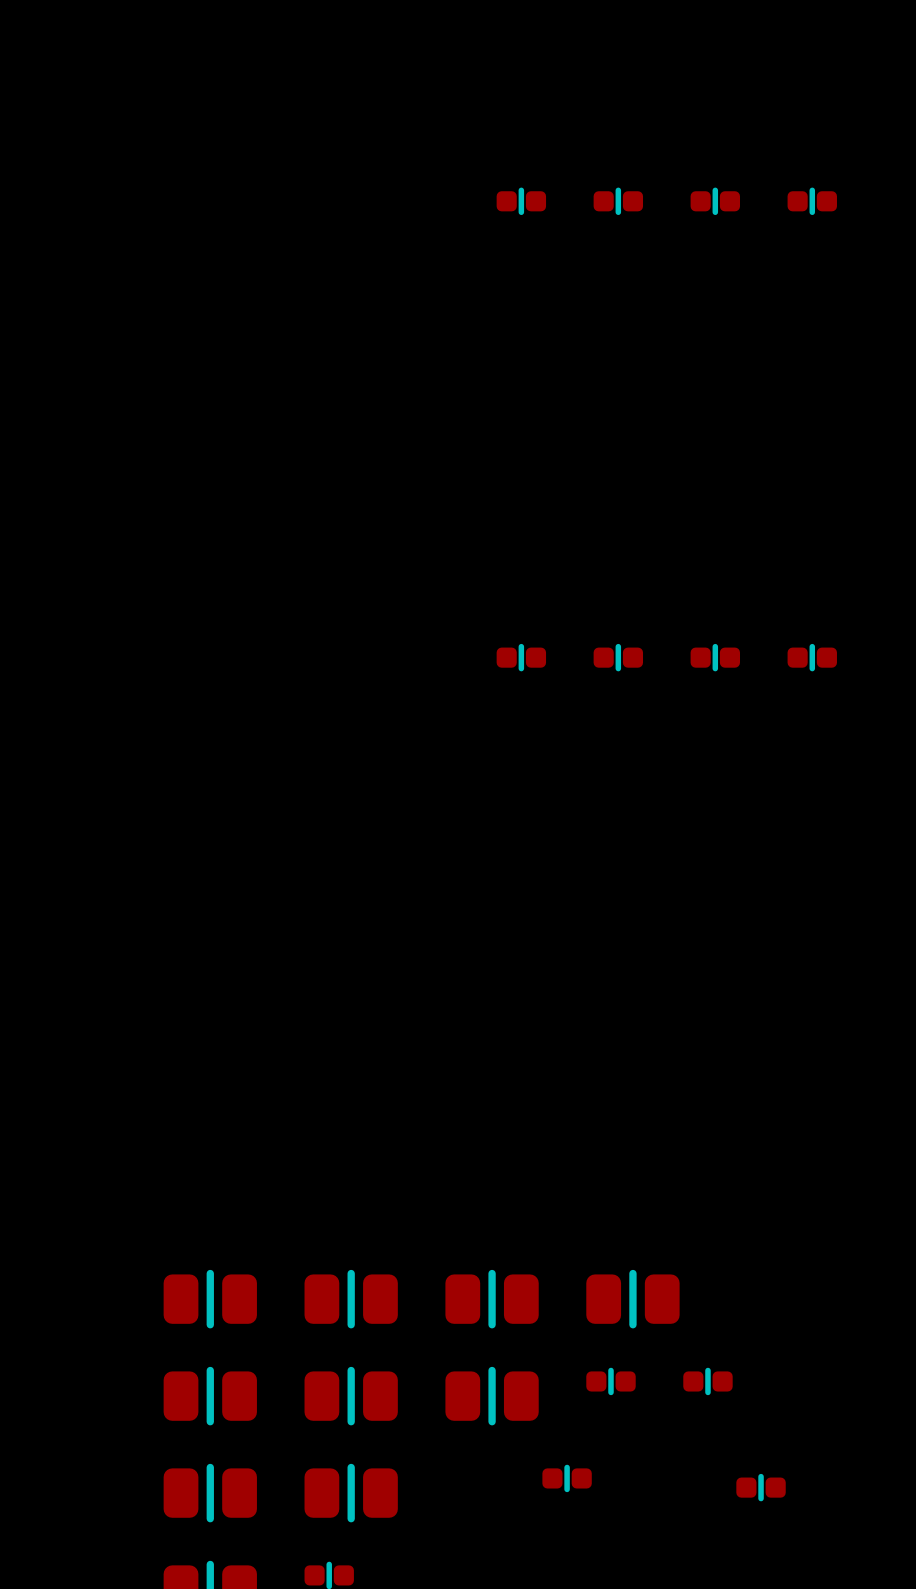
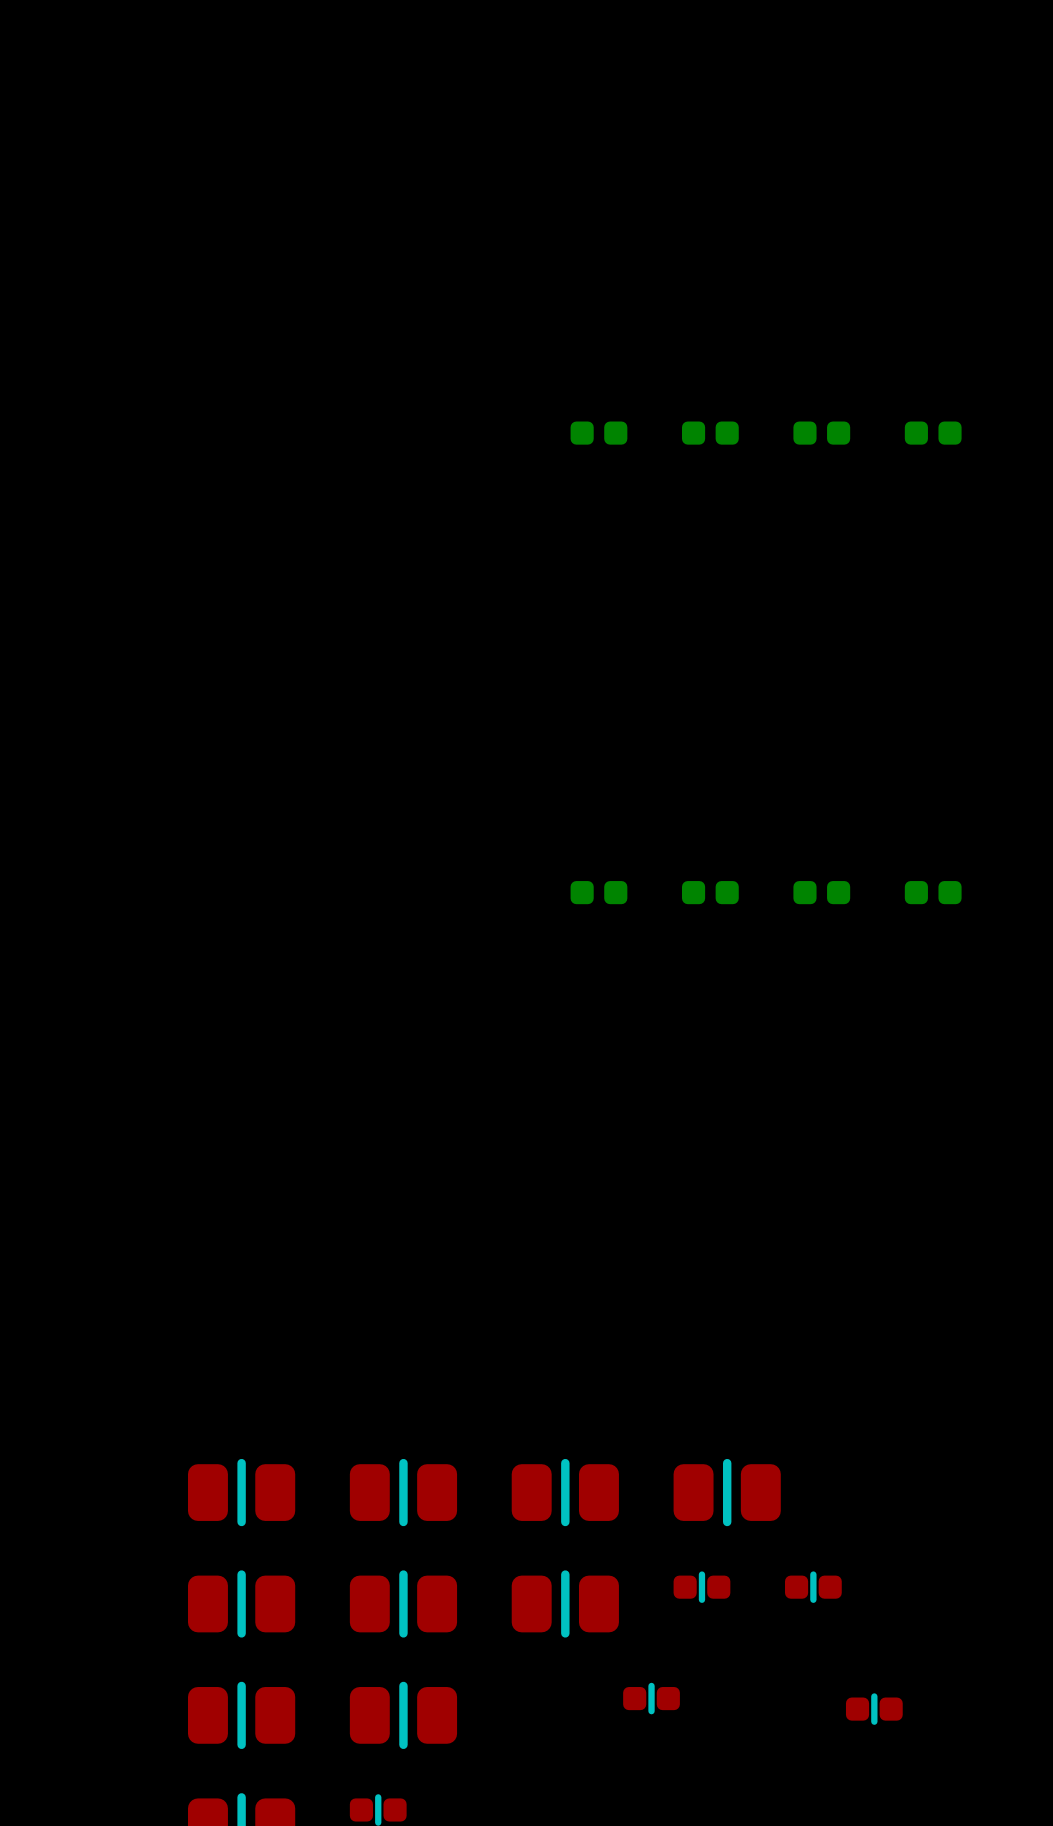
part side: top (521, 201) -> bottom (598, 433)
part side: top (618, 201) -> bottom (710, 433)
part side: top (715, 201) -> bottom (821, 433)
part side: top (812, 201) -> bottom (933, 433)
part side: top (521, 657) -> bottom (598, 892)
part side: top (618, 657) -> bottom (710, 892)
part side: top (715, 657) -> bottom (821, 892)
part side: top (812, 657) -> bottom (933, 892)

